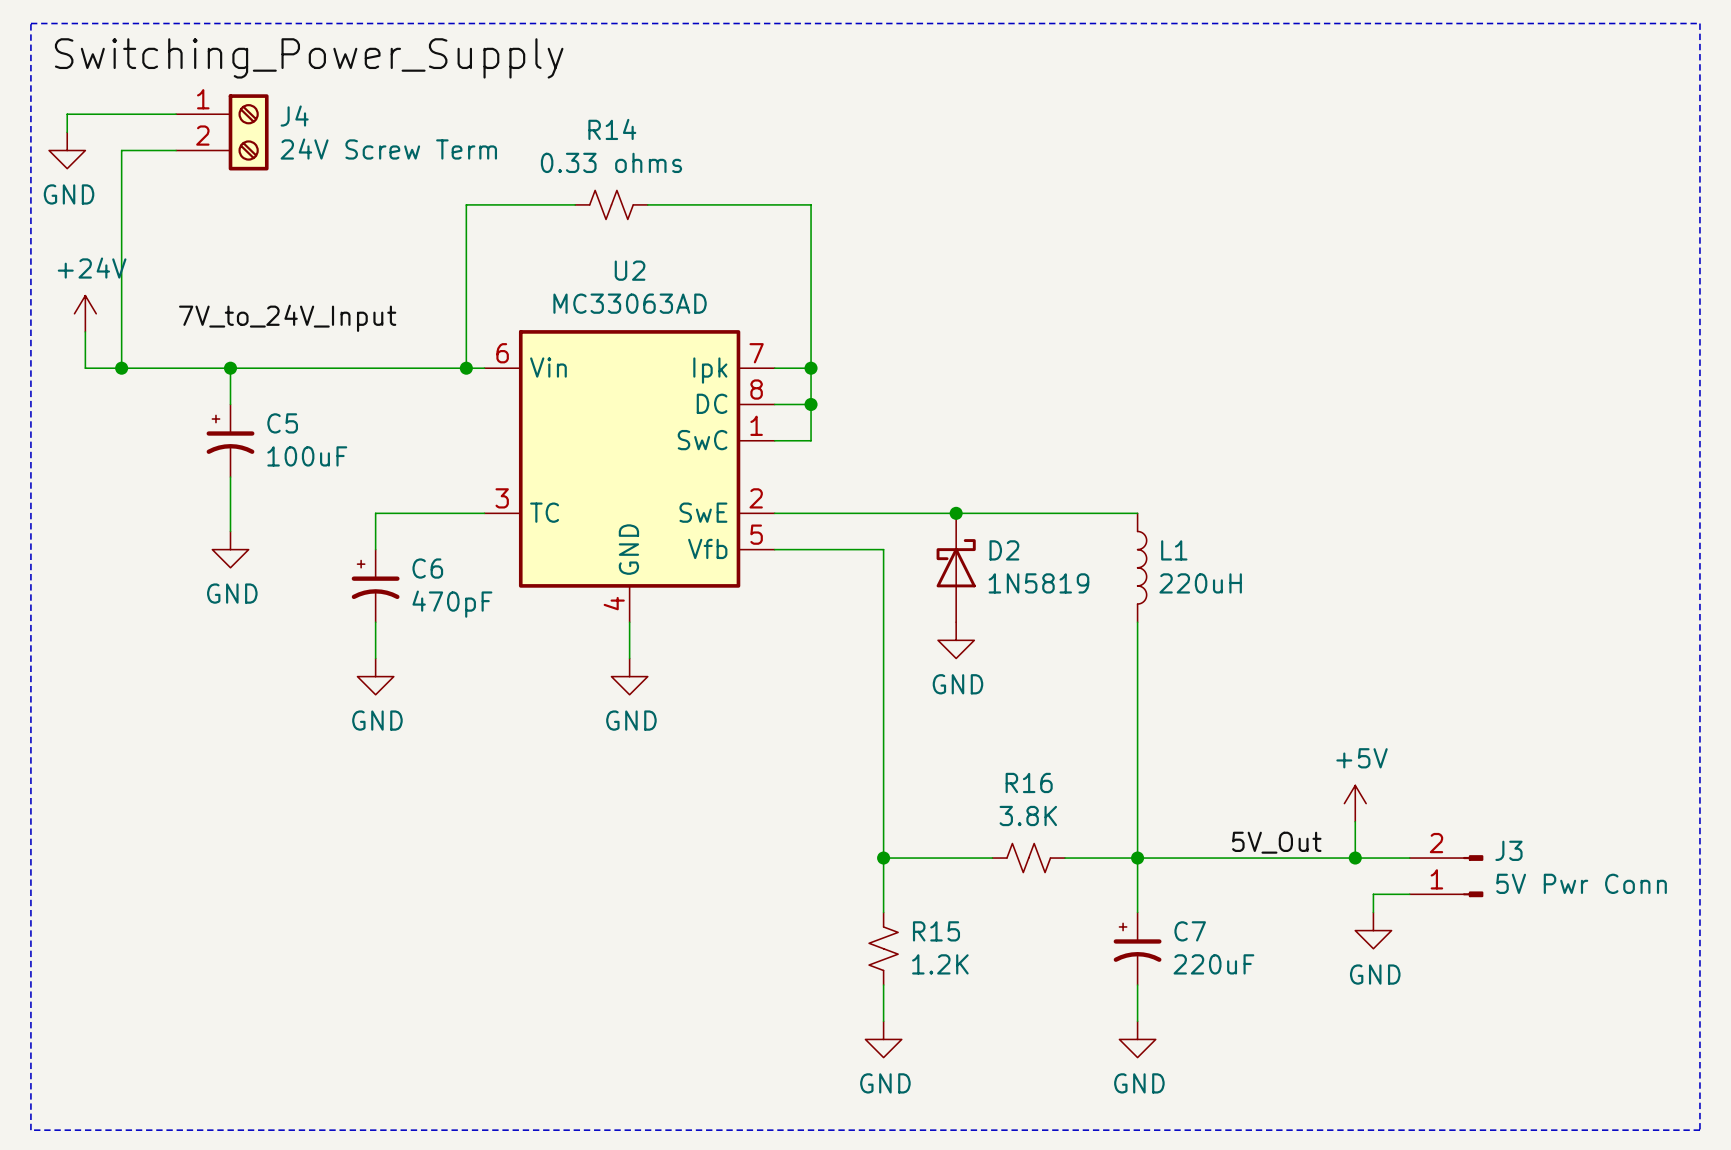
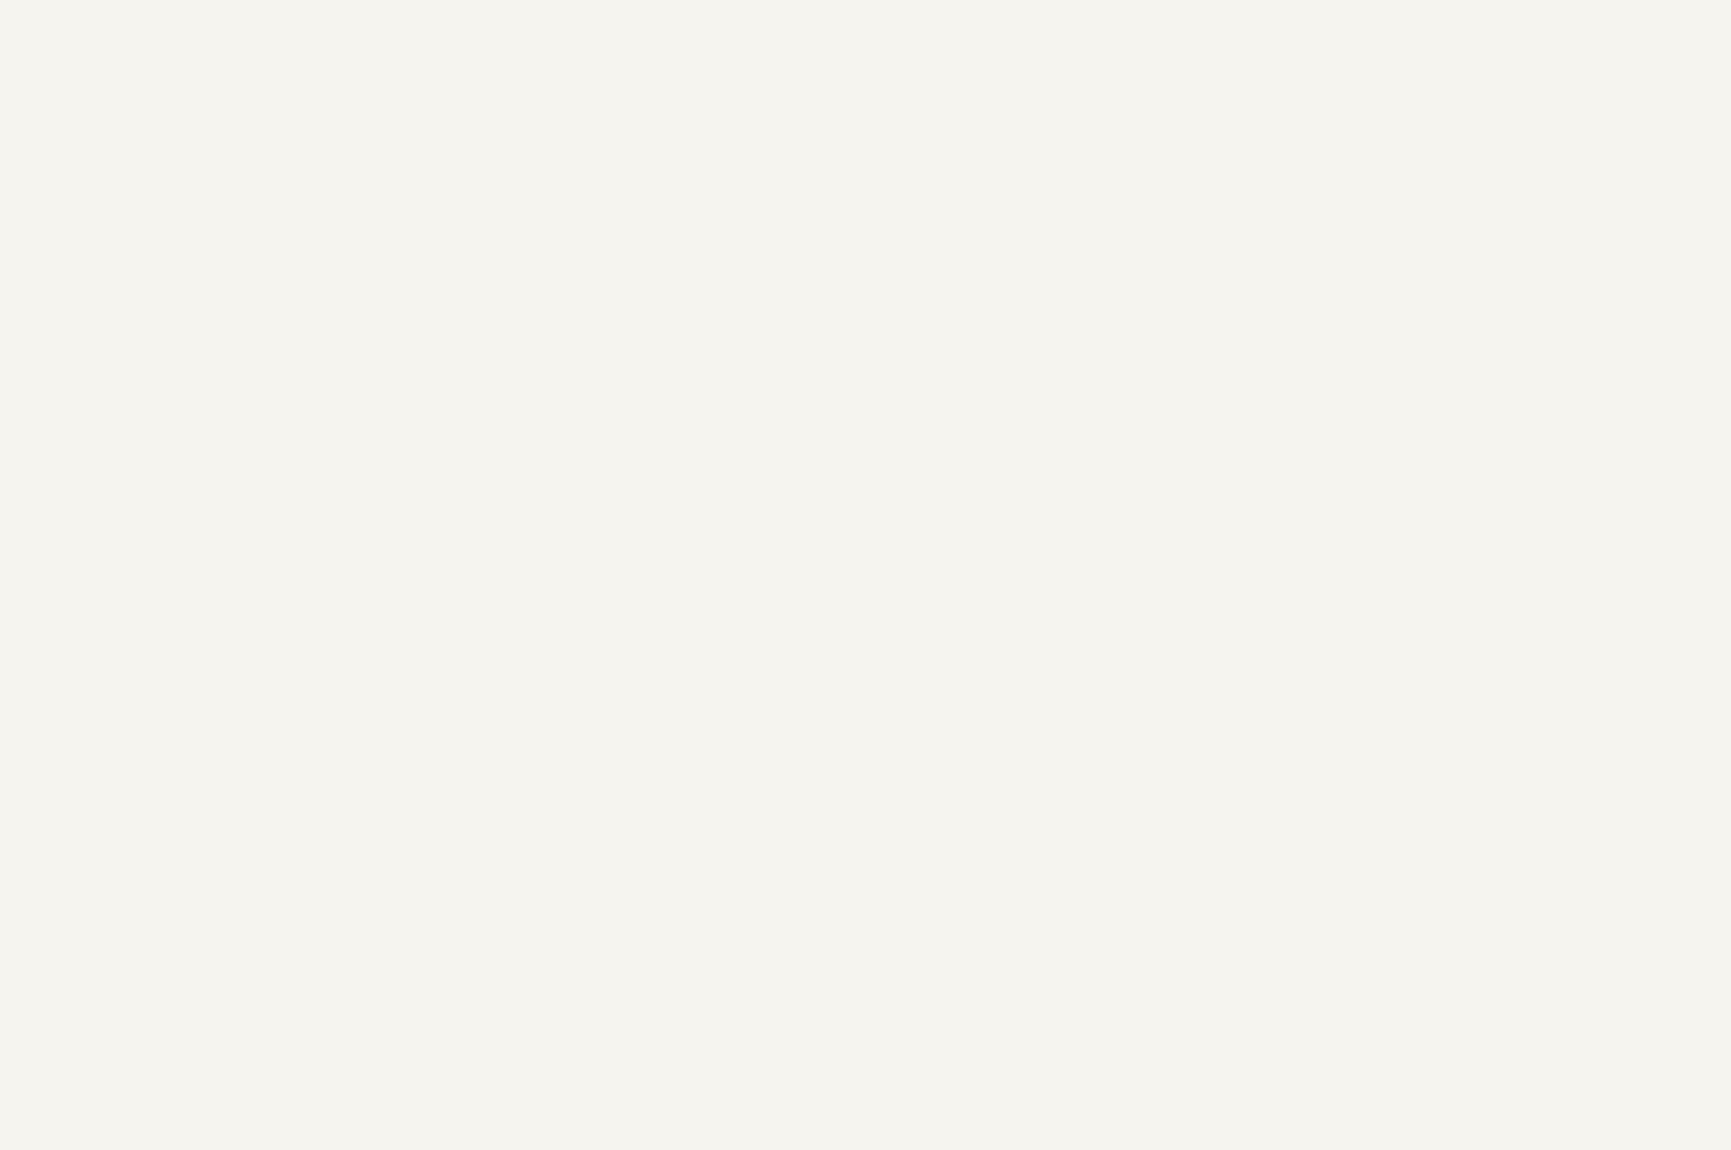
line: (30, 23) (1699, 23) (1699, 1130) (30, 1130) (30, 23) -> none
label: Switching_Power_Supply (309, 58) -> none
wire: (176, 114) (67, 114) (67, 132) -> none
J4: 24V Screw Term (222, 132) -> none
power symbol: GND (67, 150) -> none
wire: (176, 150) (121, 150) (121, 368) -> none
wire: (575, 204) (466, 204) (466, 368) -> none
R14: 0.33 ohms (611, 204) -> none
wire: (647, 204) (811, 204) (811, 440) (774, 440) -> none
power symbol: +24V (85, 313) -> none
label: 7V_to_24V_Input (287, 318) -> none
wire: (85, 331) (85, 368) (484, 368) -> none
junction: (121, 368) -> none
wire: (230, 368) (230, 404) -> none
junction: (230, 368) -> none
junction: (466, 368) -> none
wire: (774, 368) (811, 368) -> none
junction: (811, 368) -> none
wire: (774, 404) (811, 404) -> none
junction: (811, 404) -> none
C5: 100uF (230, 440) -> none
U2: MC33063AD (629, 476) -> none
wire: (230, 477) (230, 531) -> none
wire: (484, 513) (375, 513) (375, 549) -> none
wire: (774, 513) (1137, 513) -> none
junction: (956, 513) -> none
power symbol: GND (230, 549) -> none
wire: (774, 549) (883, 549) (883, 912) -> none
D2: 1N5819 (956, 567) -> none
L1: 220uH (1142, 567) -> none
C6: 470pF (375, 585) -> none
wire: (375, 622) (375, 658) -> none
wire: (629, 622) (629, 658) -> none
wire: (1137, 622) (1137, 912) -> none
power symbol: GND (956, 640) -> none
power symbol: GND (375, 676) -> none
power symbol: GND (629, 676) -> none
power symbol: +5V (1355, 803) -> none
wire: (1355, 821) (1355, 858) -> none
label: 5V_Out (1276, 842) -> none
wire: (883, 858) (992, 858) -> none
junction: (883, 858) -> none
R16: 3.8K (1028, 858) -> none
wire: (1065, 858) (1409, 858) -> none
junction: (1137, 858) -> none
junction: (1355, 858) -> none
J3: 5V Pwr Conn (1446, 876) -> none
wire: (1409, 894) (1373, 894) (1373, 912) -> none
power symbol: GND (1373, 930) -> none
R15: 1.2K (883, 948) -> none
C7: 220uF (1137, 948) -> none
wire: (883, 985) (883, 1021) -> none
wire: (1137, 985) (1137, 1021) -> none
power symbol: GND (883, 1039) -> none
power symbol: GND (1137, 1039) -> none

